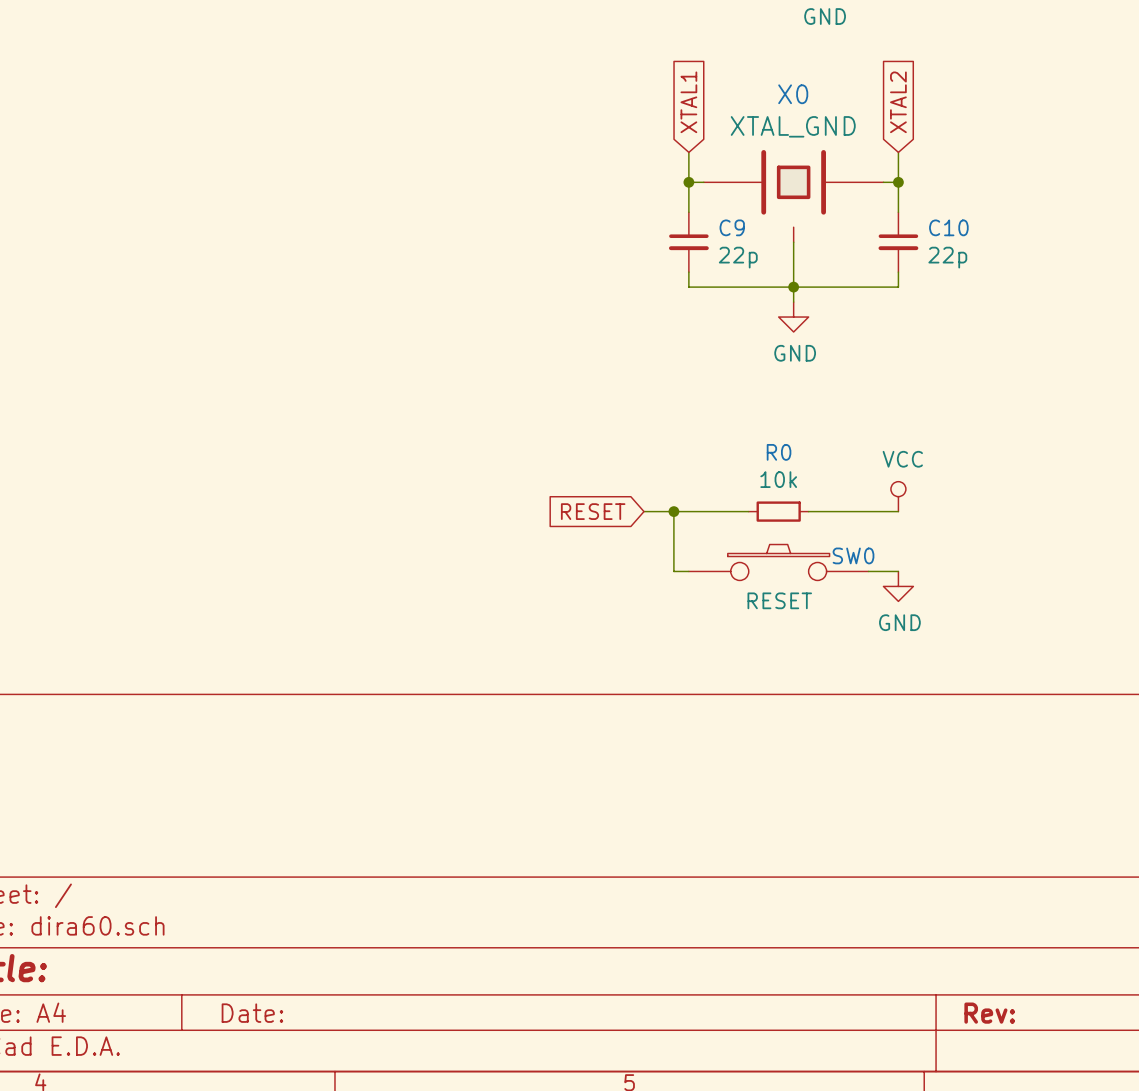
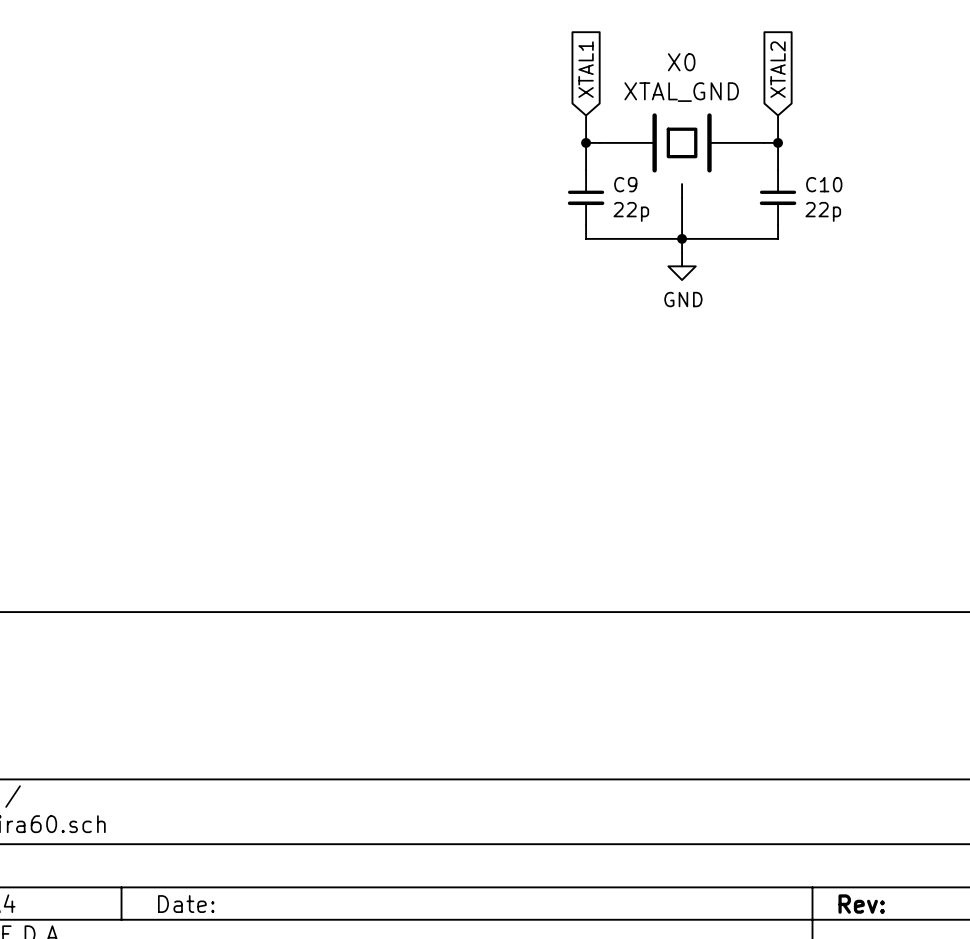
power symbol: VCC (898, 496) -> none
global label: RESET (593, 511) -> none
wire: (643, 511) (748, 511) -> none
wire: (673, 511) (673, 571) (688, 571) -> none
junction: (673, 511) -> none
R0: 10k (778, 511) -> none
wire: (808, 511) (898, 511) -> none
SW0: RESET (778, 562) -> none
wire: (868, 571) (898, 571) -> none
power symbol: GND (898, 586) -> none

